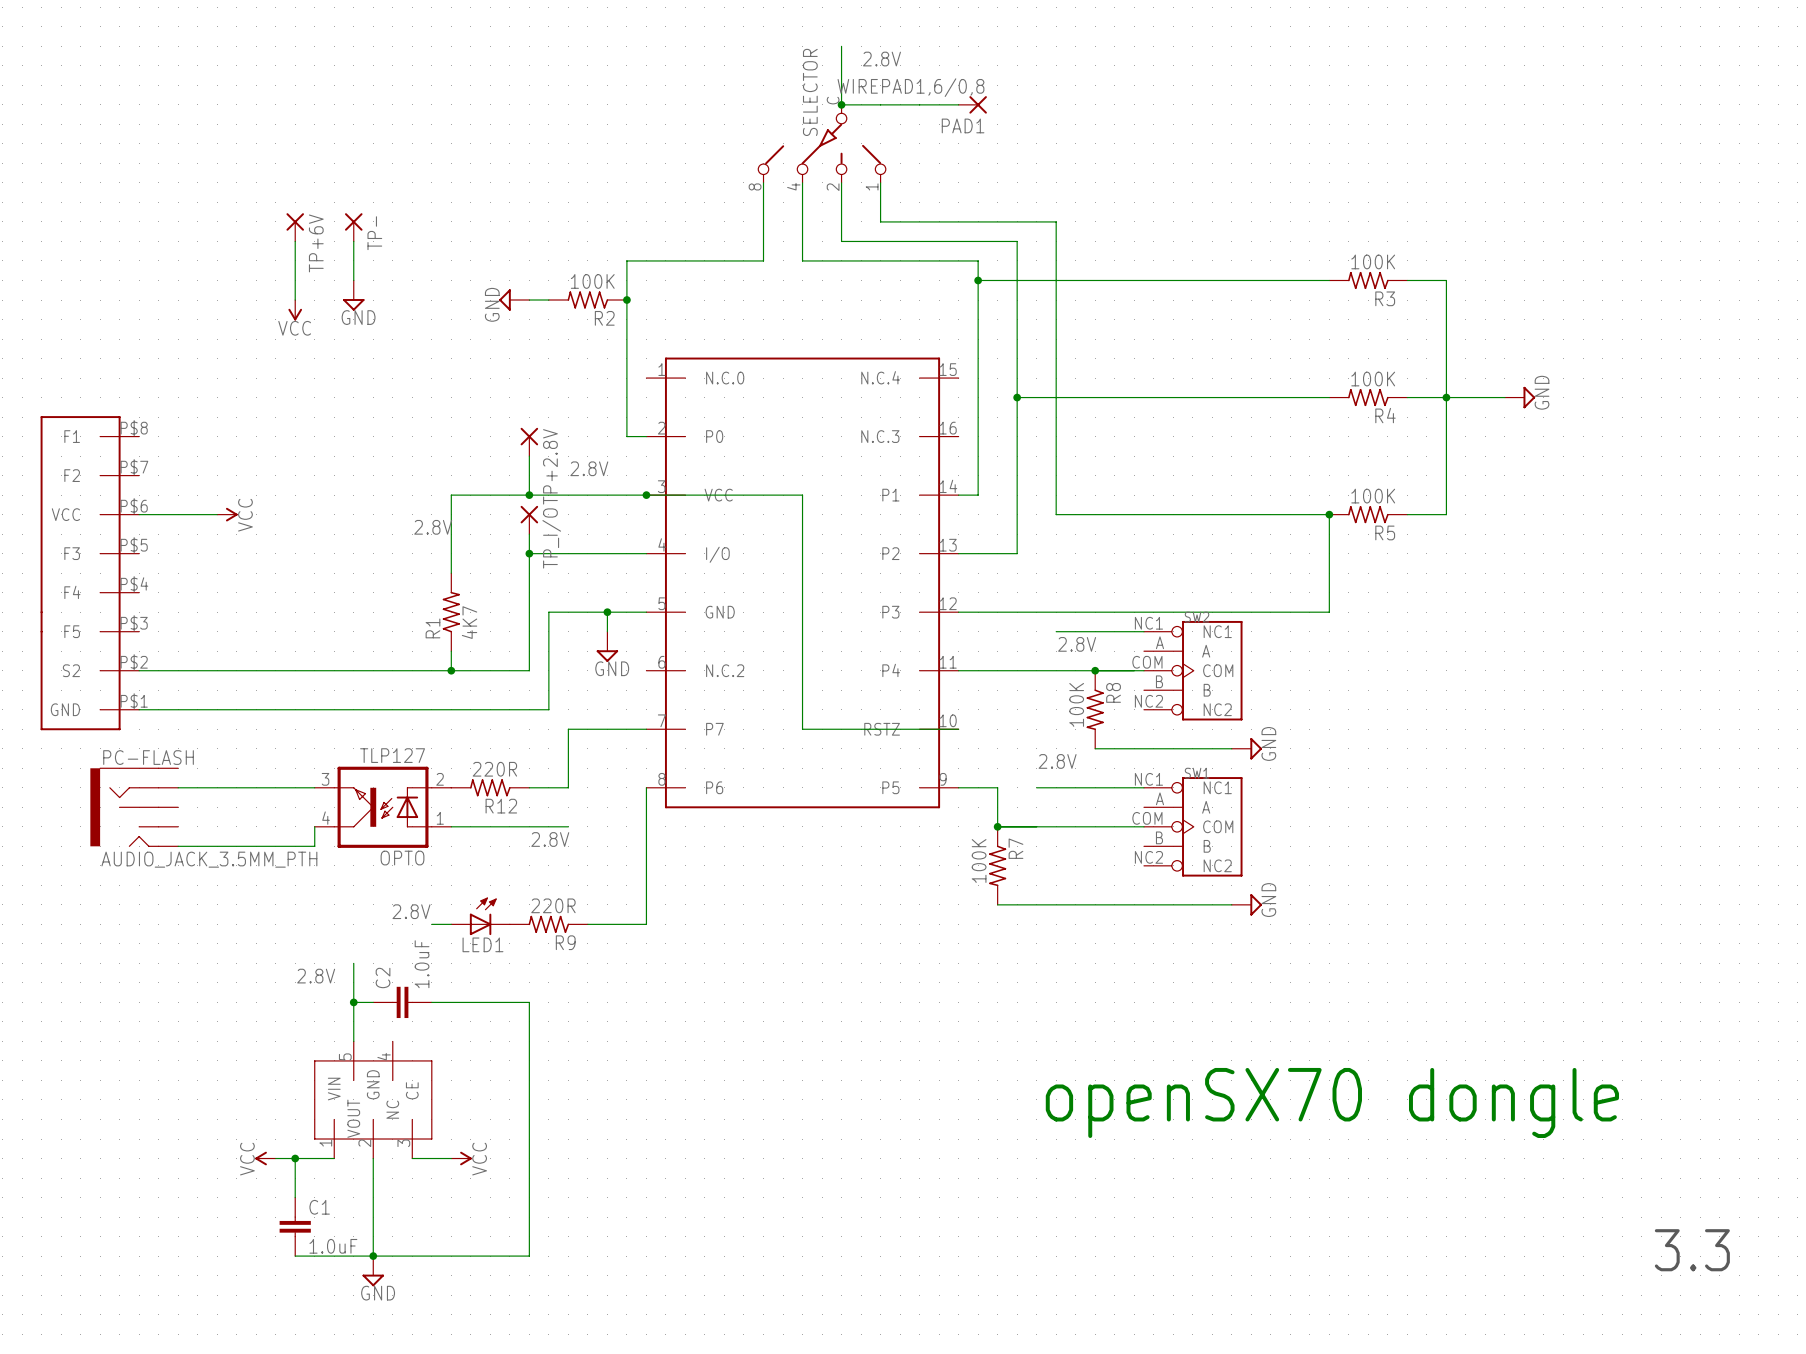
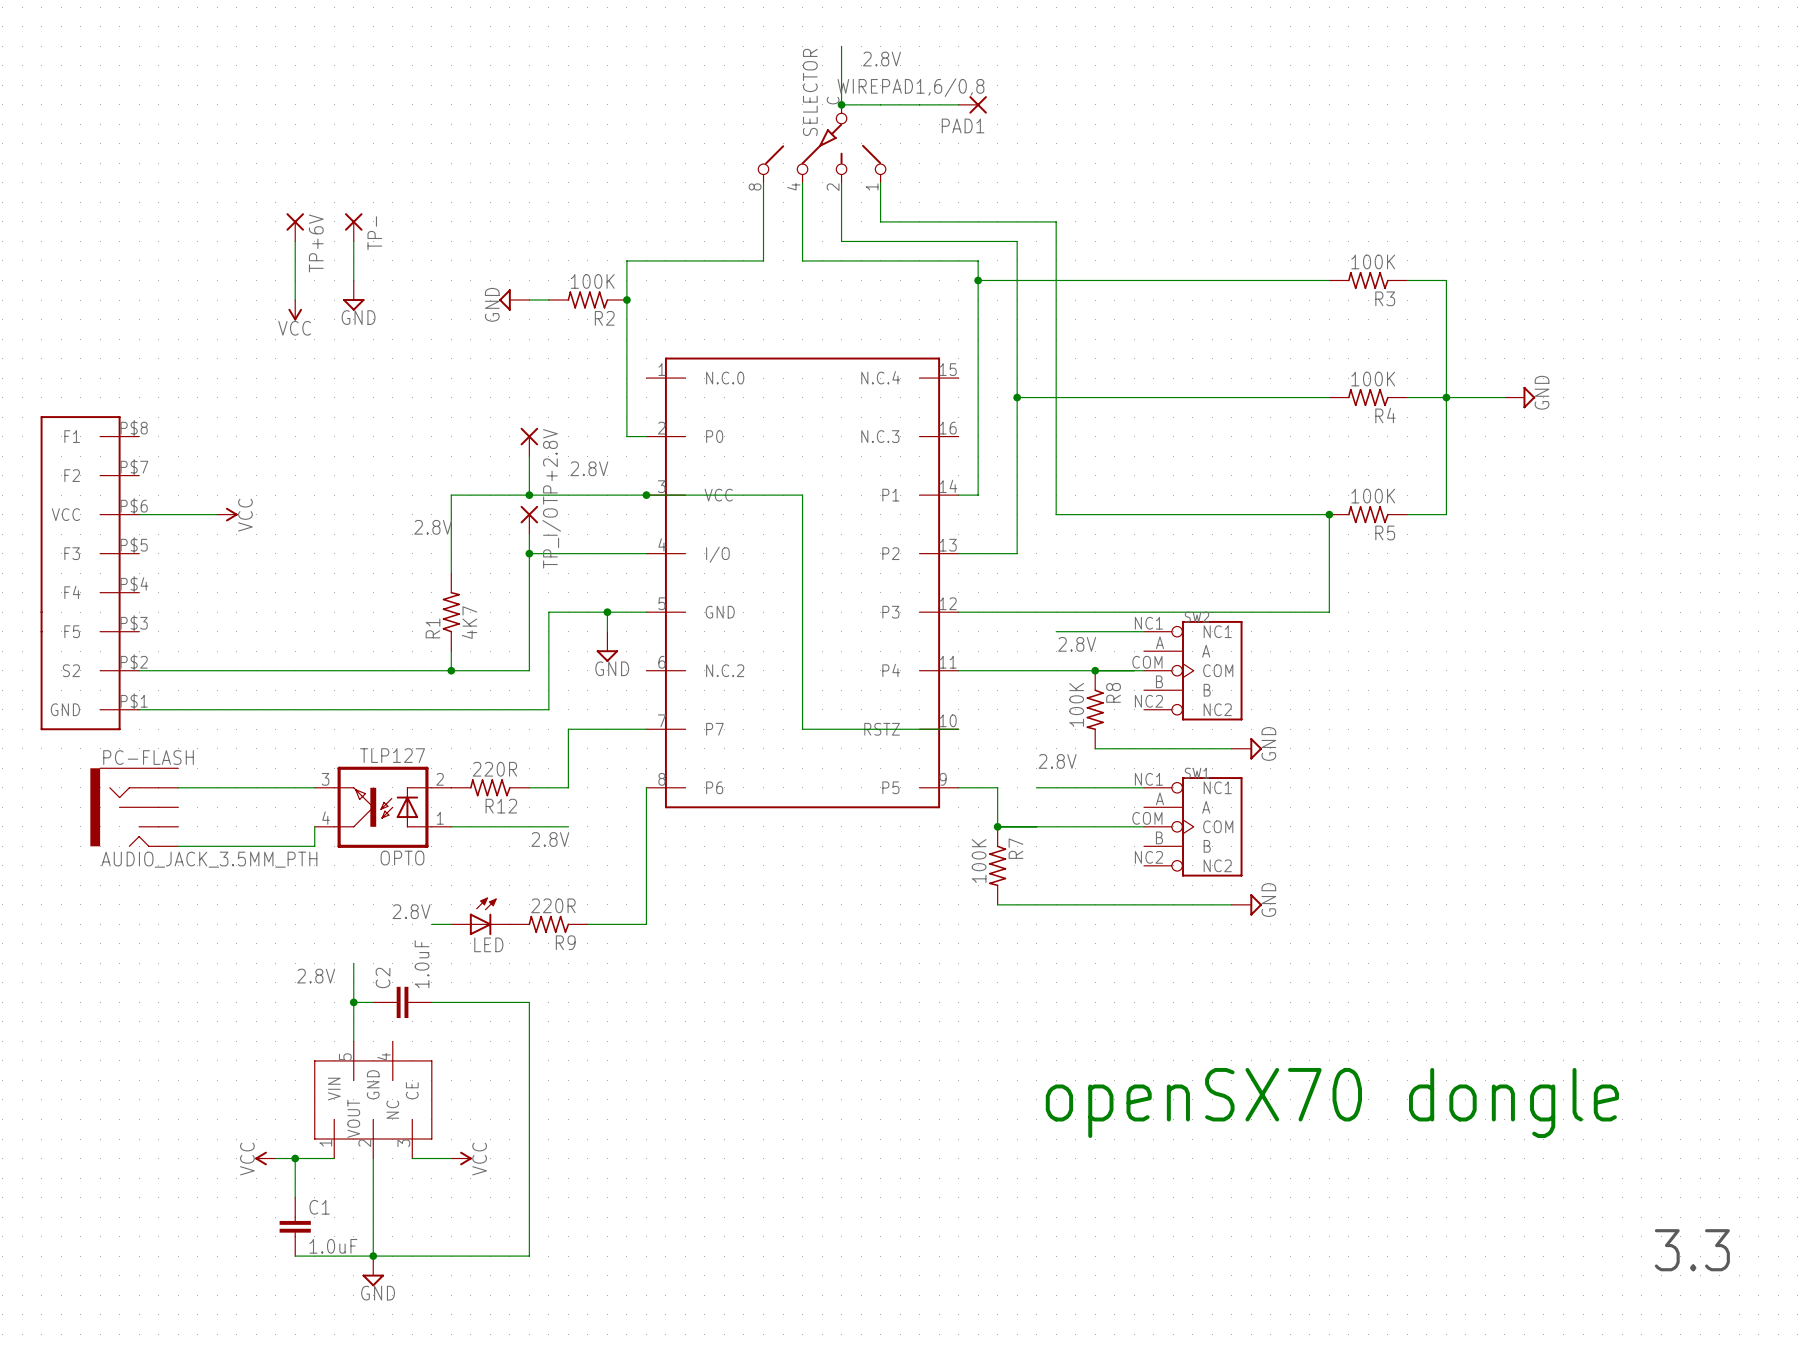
LED1 name: LED1 (482, 944) -> LED (488, 944)

